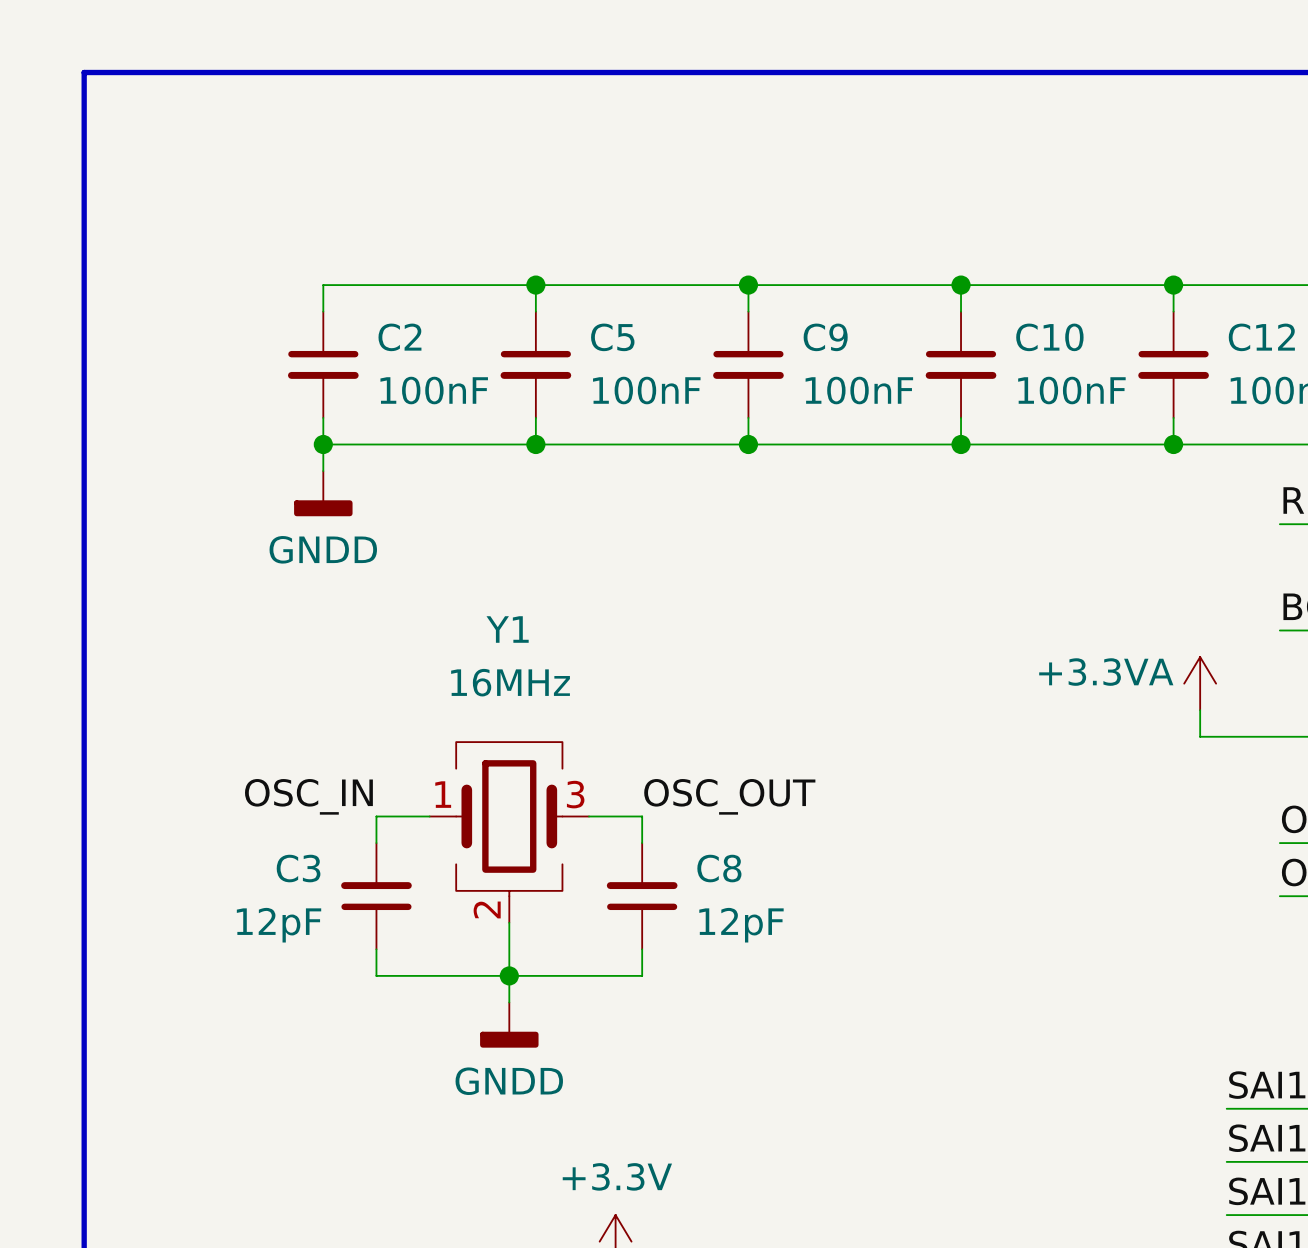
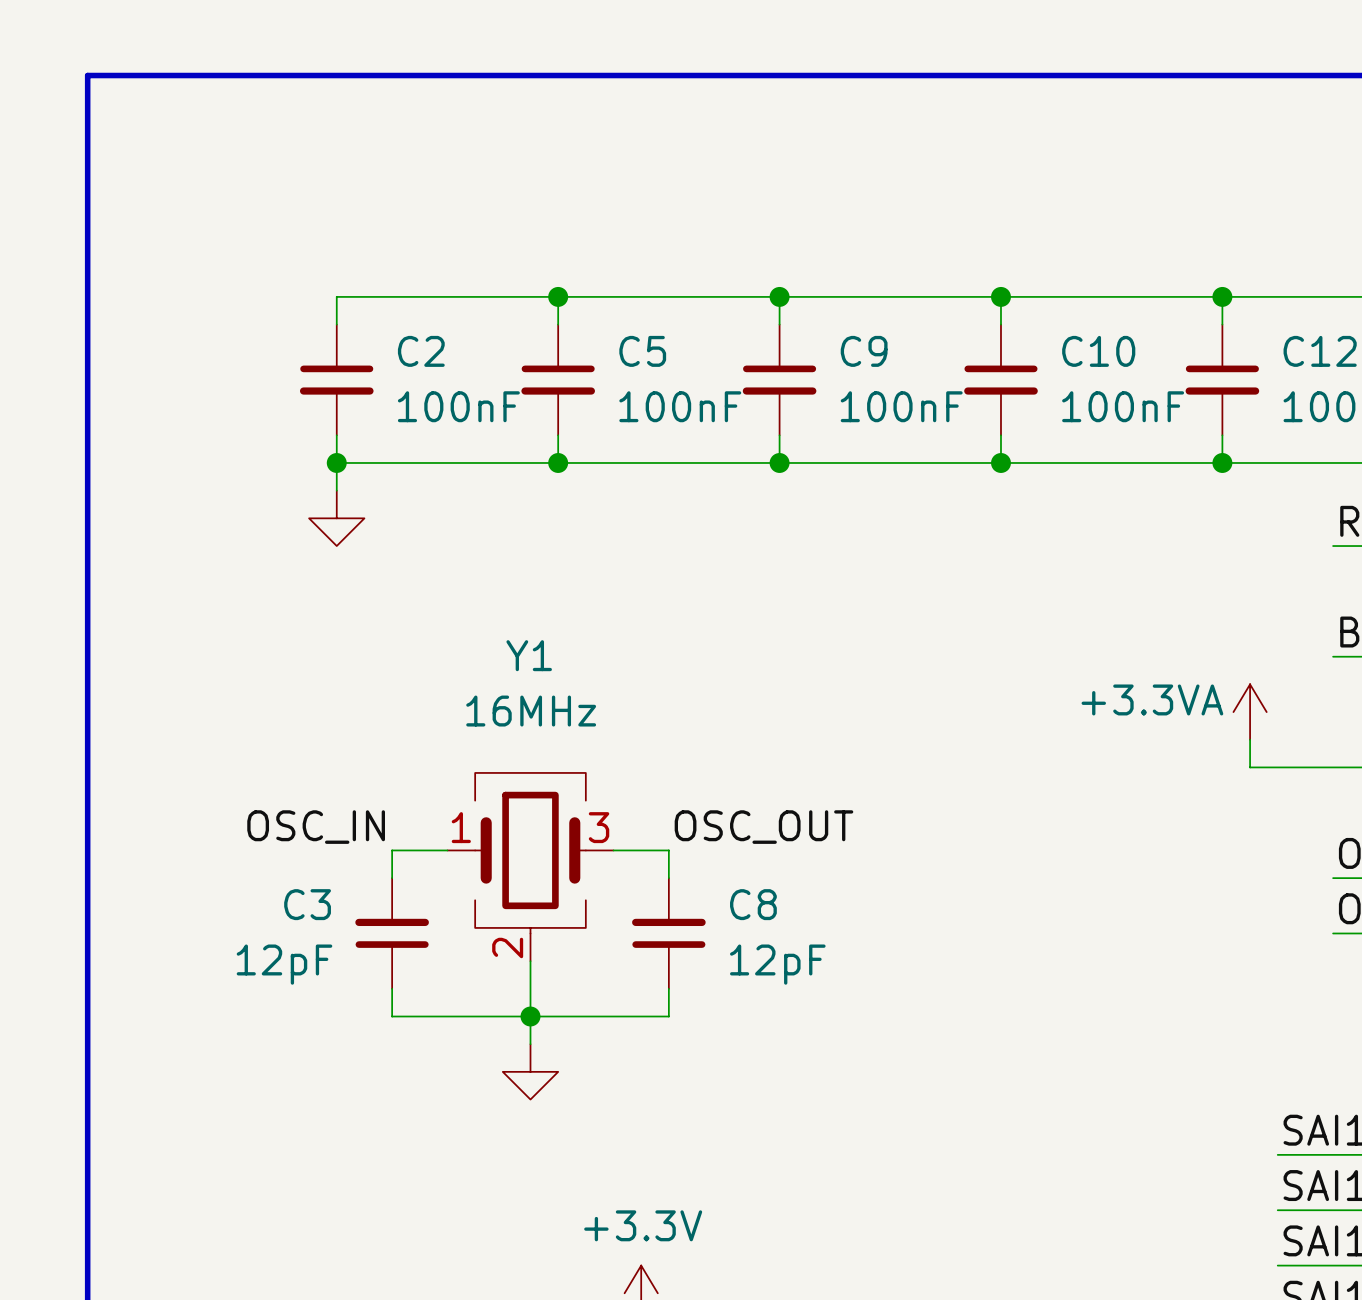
power symbol shape: [294, 471, 353, 517] -> [309, 490, 365, 547]
power symbol text: GNDD (323, 549) -> none
power symbol shape: [480, 1002, 539, 1048] -> [502, 1044, 559, 1100]
power symbol text: GNDD (509, 1081) -> none

